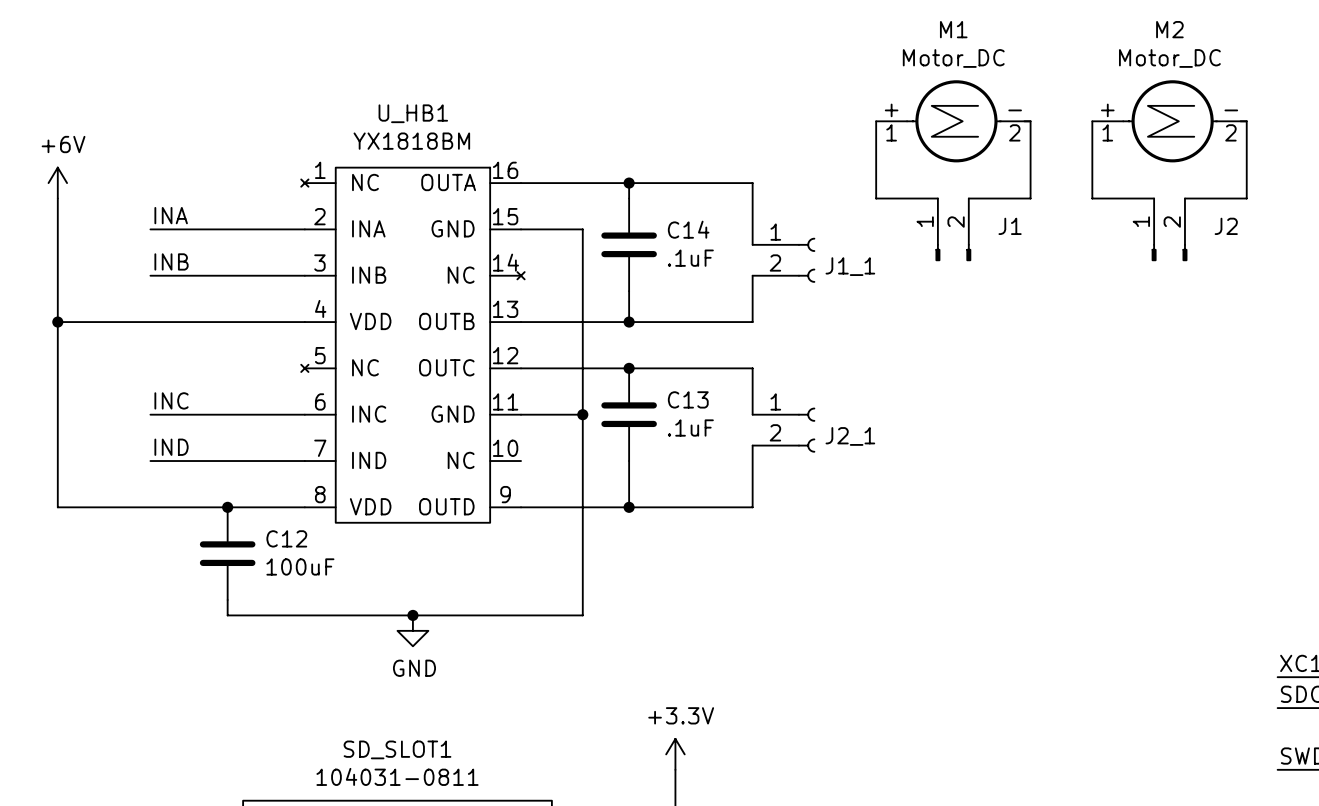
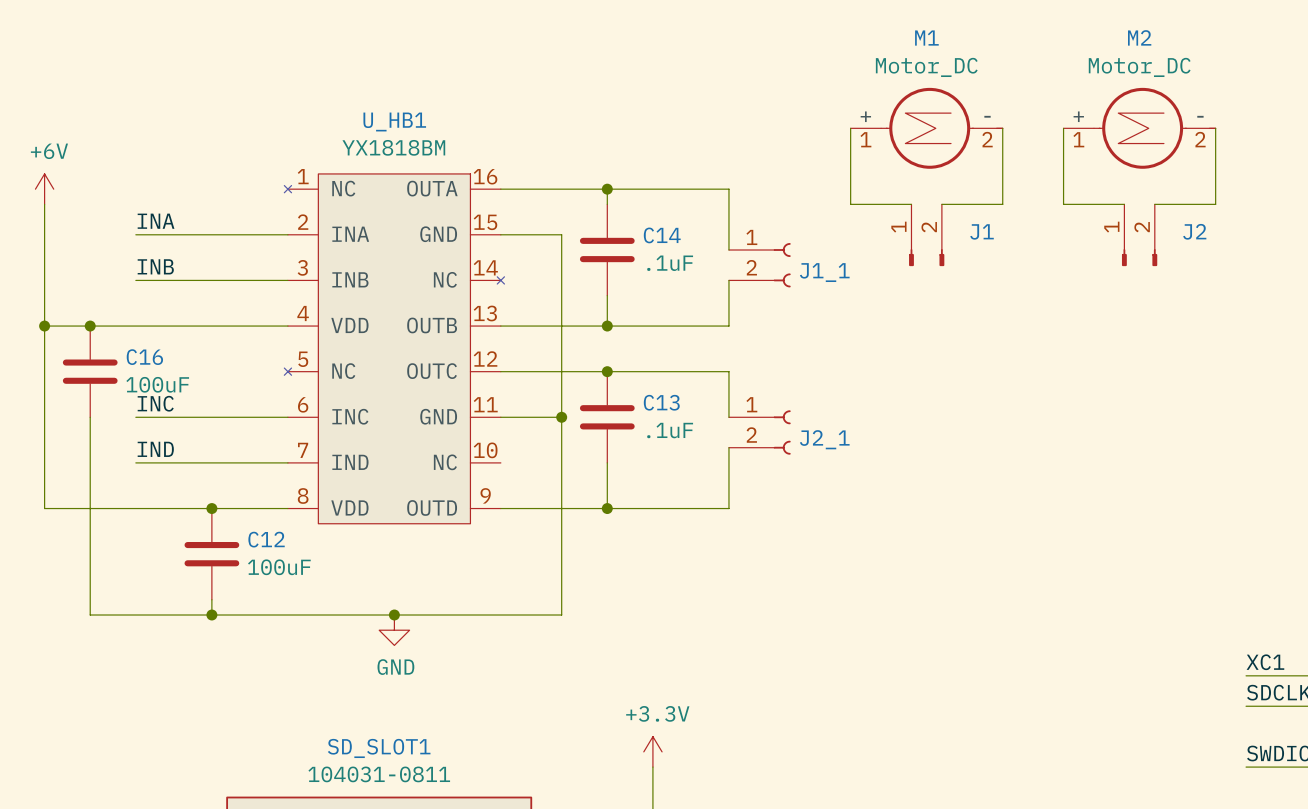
junction: none -> (90, 326)
C16: none -> 100uF (90, 371)
wire: none -> (90, 417) (90, 615) (211, 615)
junction: none -> (211, 615)

